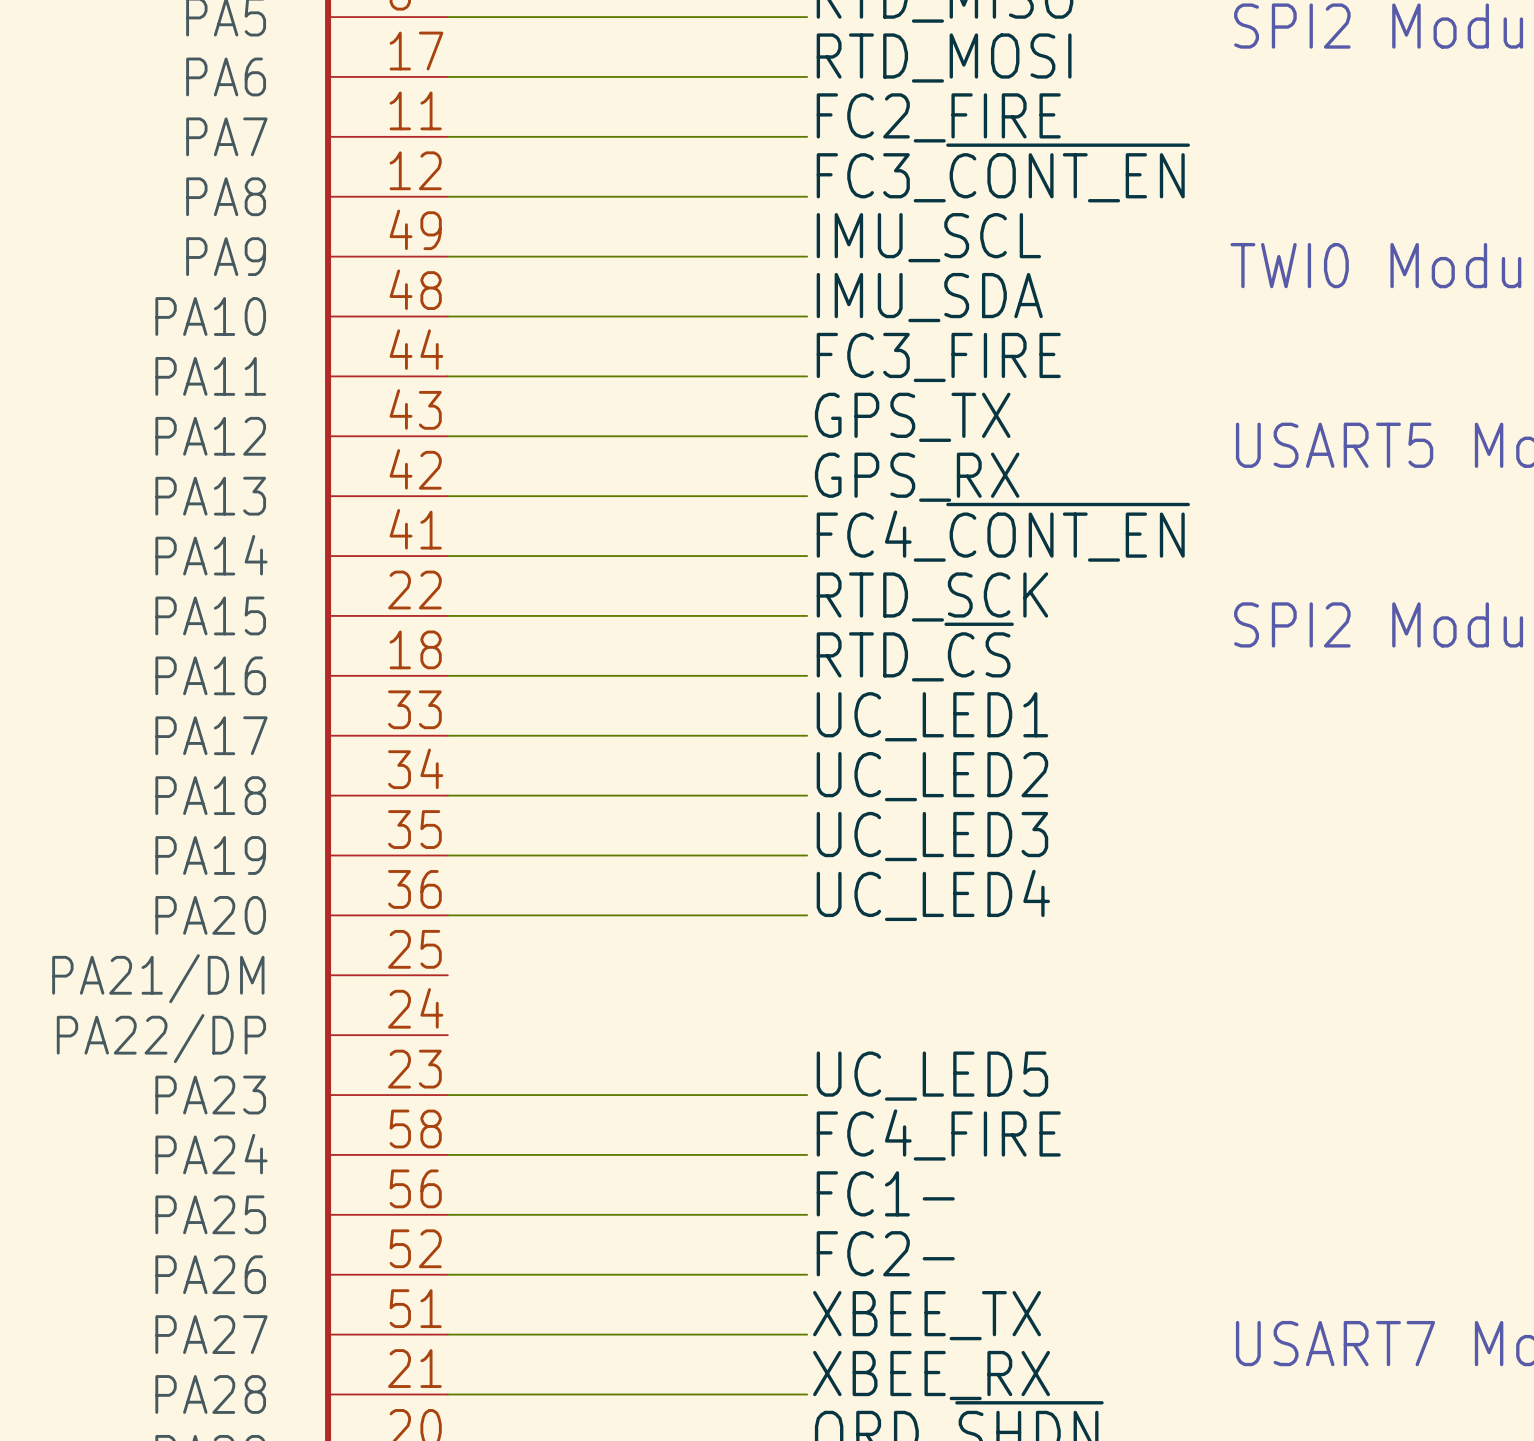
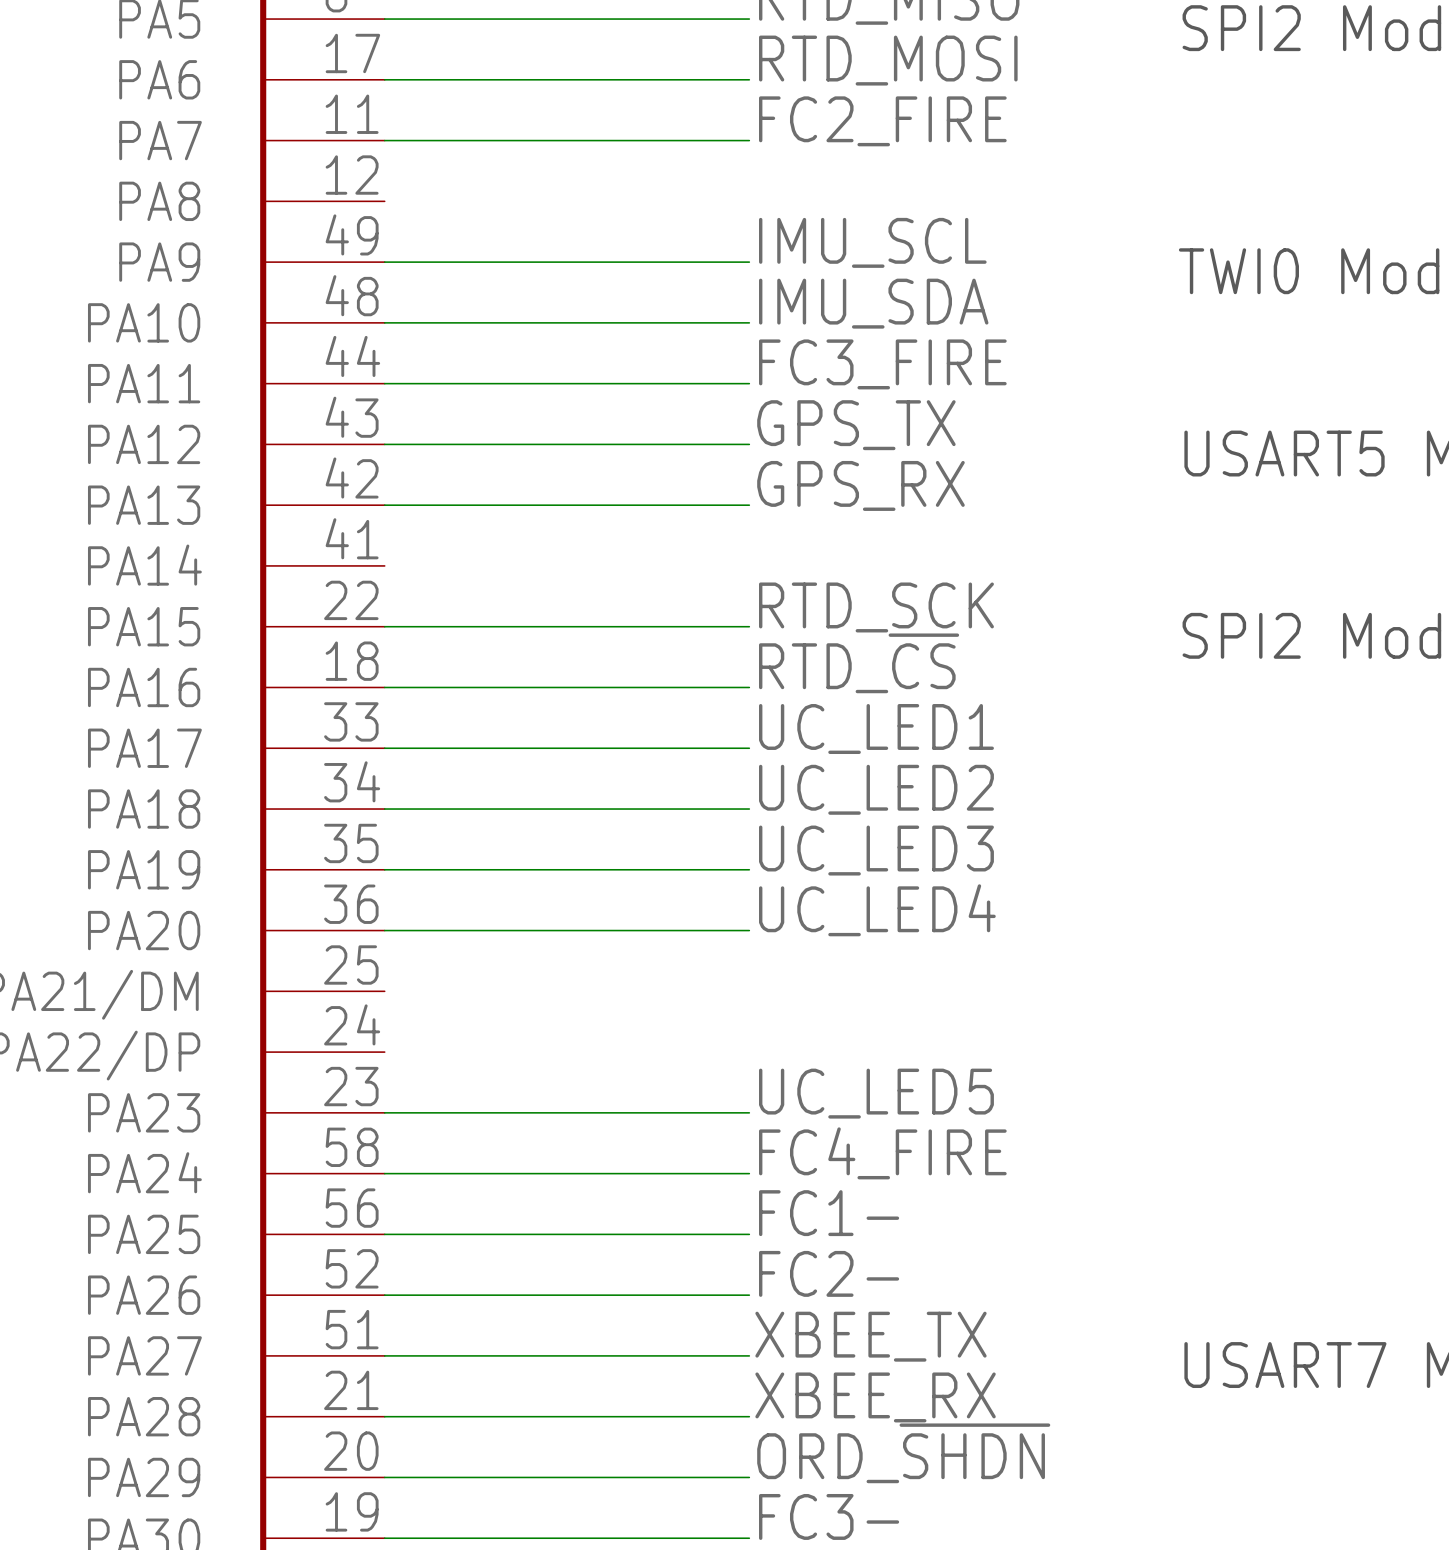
label: FC3_~{CONT_EN} (1003, 172) -> none
wire: (447, 196) (807, 196) -> none
label: FC4_~{CONT_EN} (1003, 532) -> none
wire: (447, 556) (807, 556) -> none

